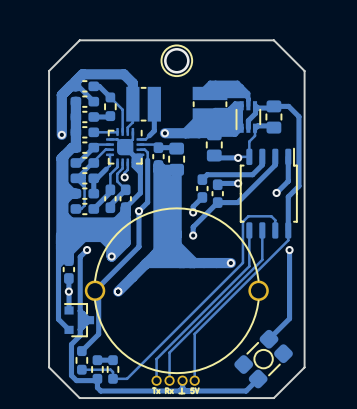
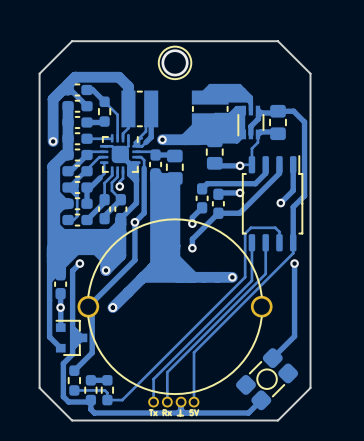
track: none -> (151, 120) (145, 125) (145, 131) (134, 142) (134, 145) (137, 142)
track: none -> (141, 138) (139, 138) (139, 145)

